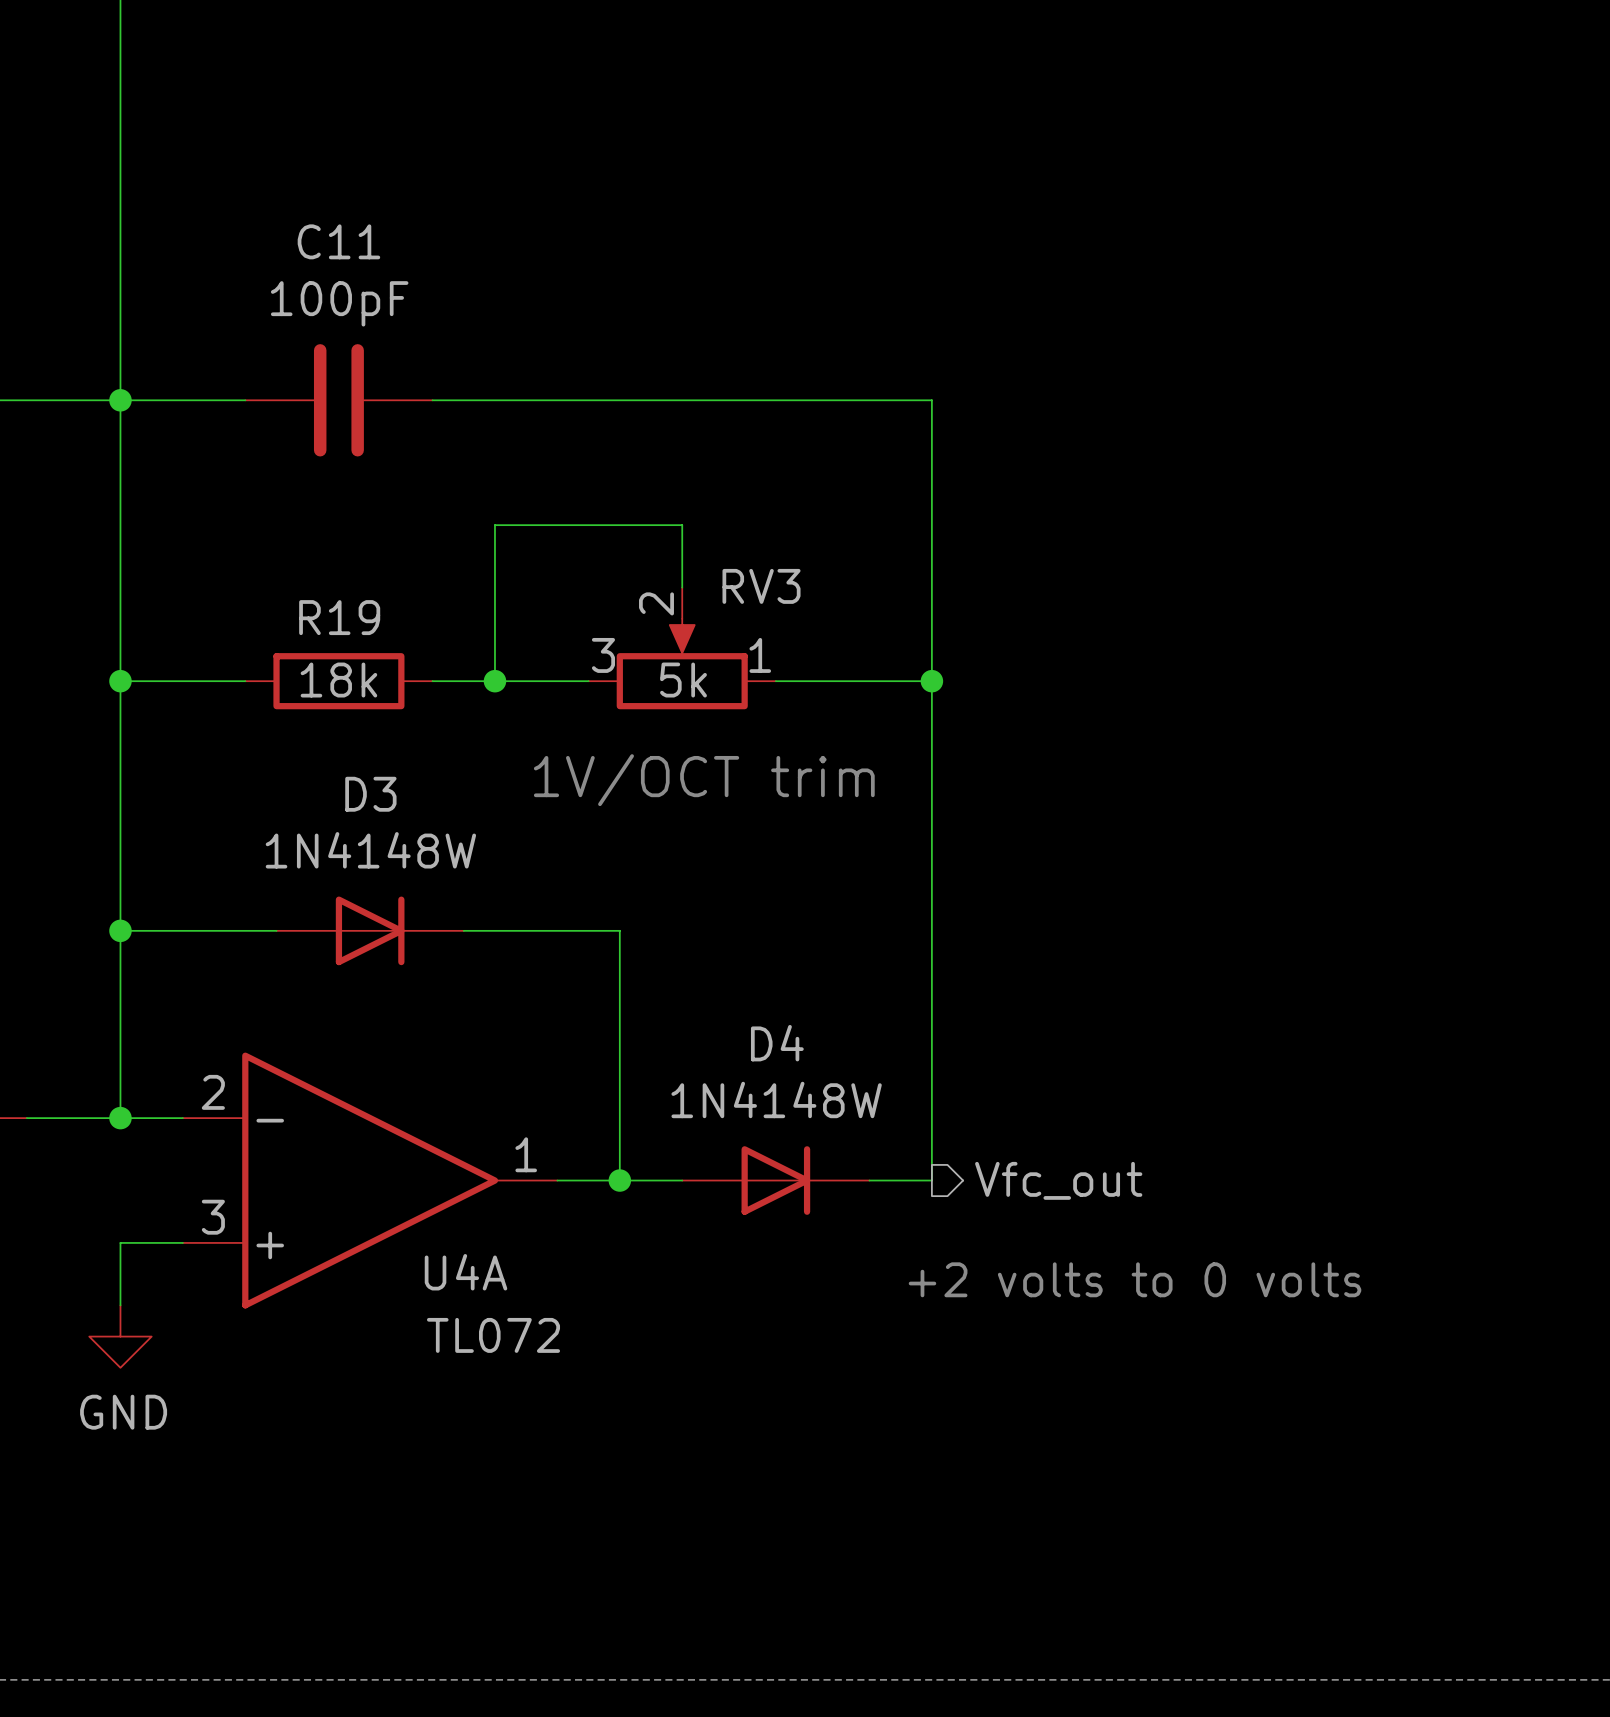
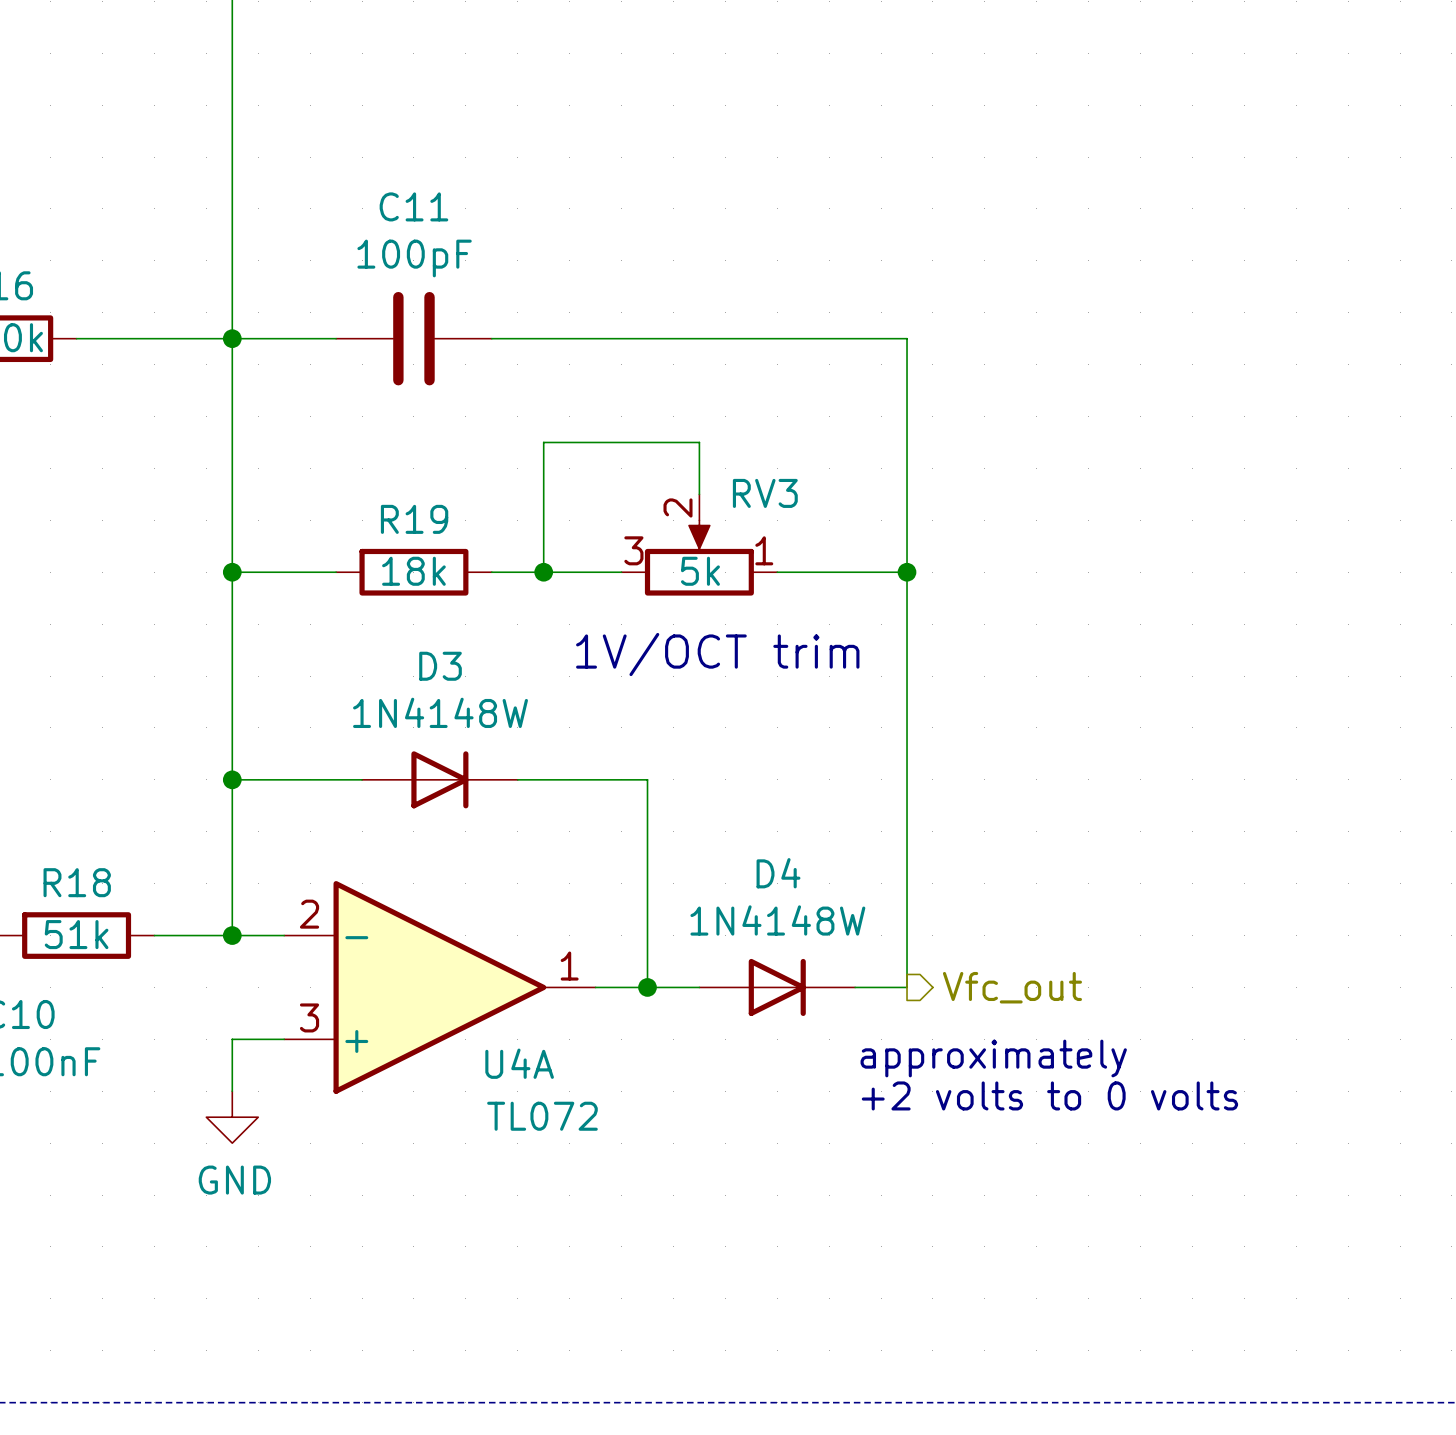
text: none -> approximately (993, 1058)
text position: +2 volts to 0 volts (1135, 1279) -> +2 volts to 0 volts (1049, 1095)

